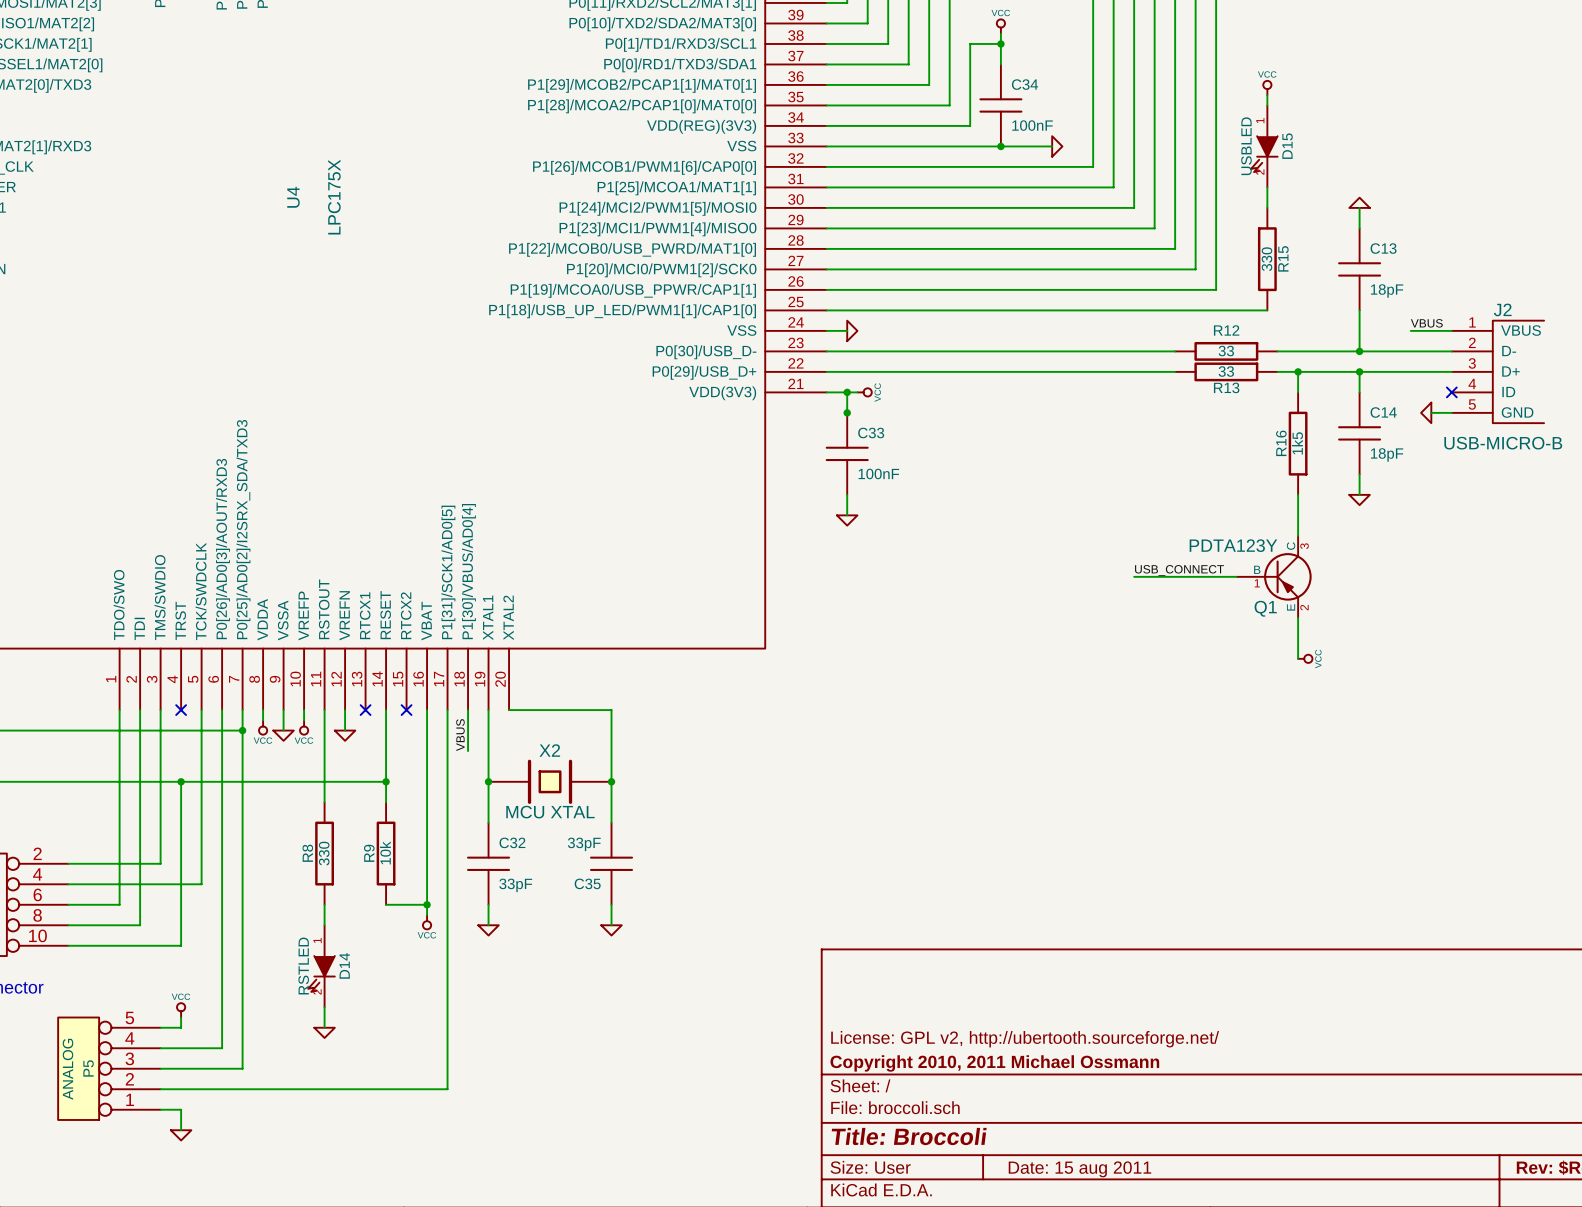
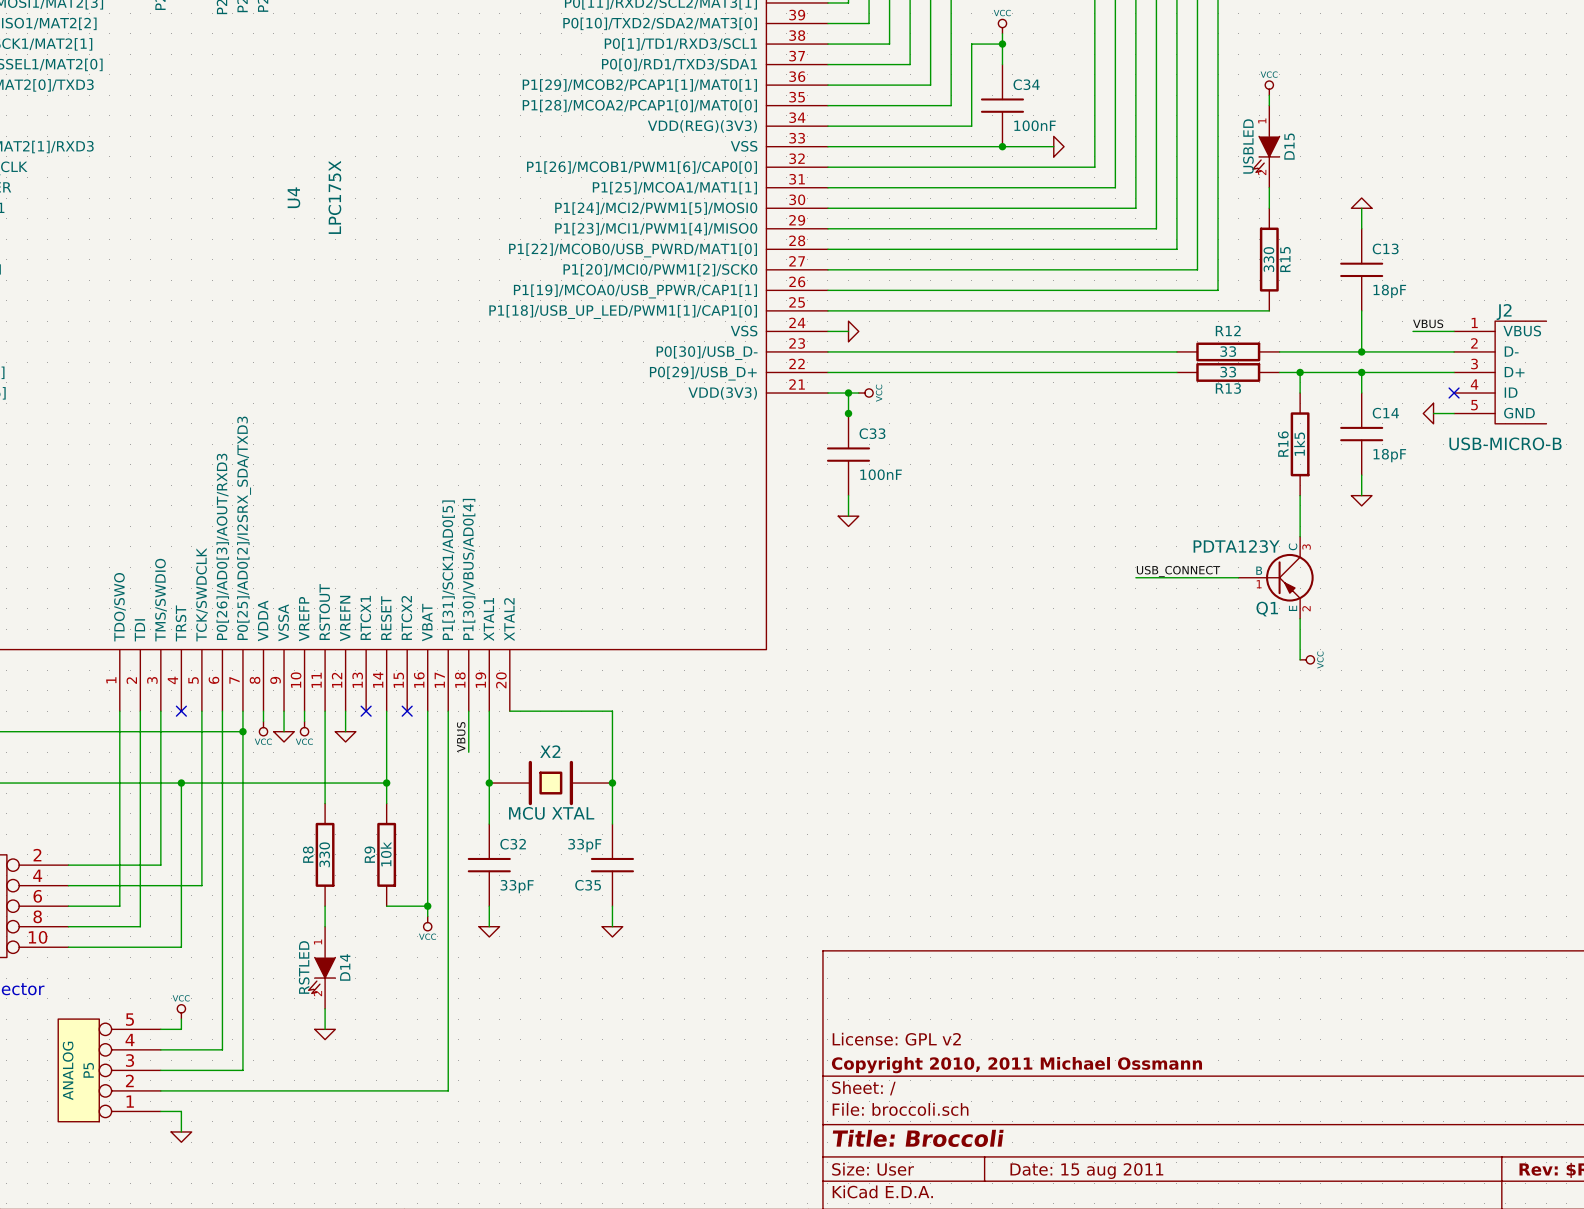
title block: License: GPL v2, http://ubertooth.sourceforge.net/ (1025, 1039) -> License: GPL v2 (896, 1039)

